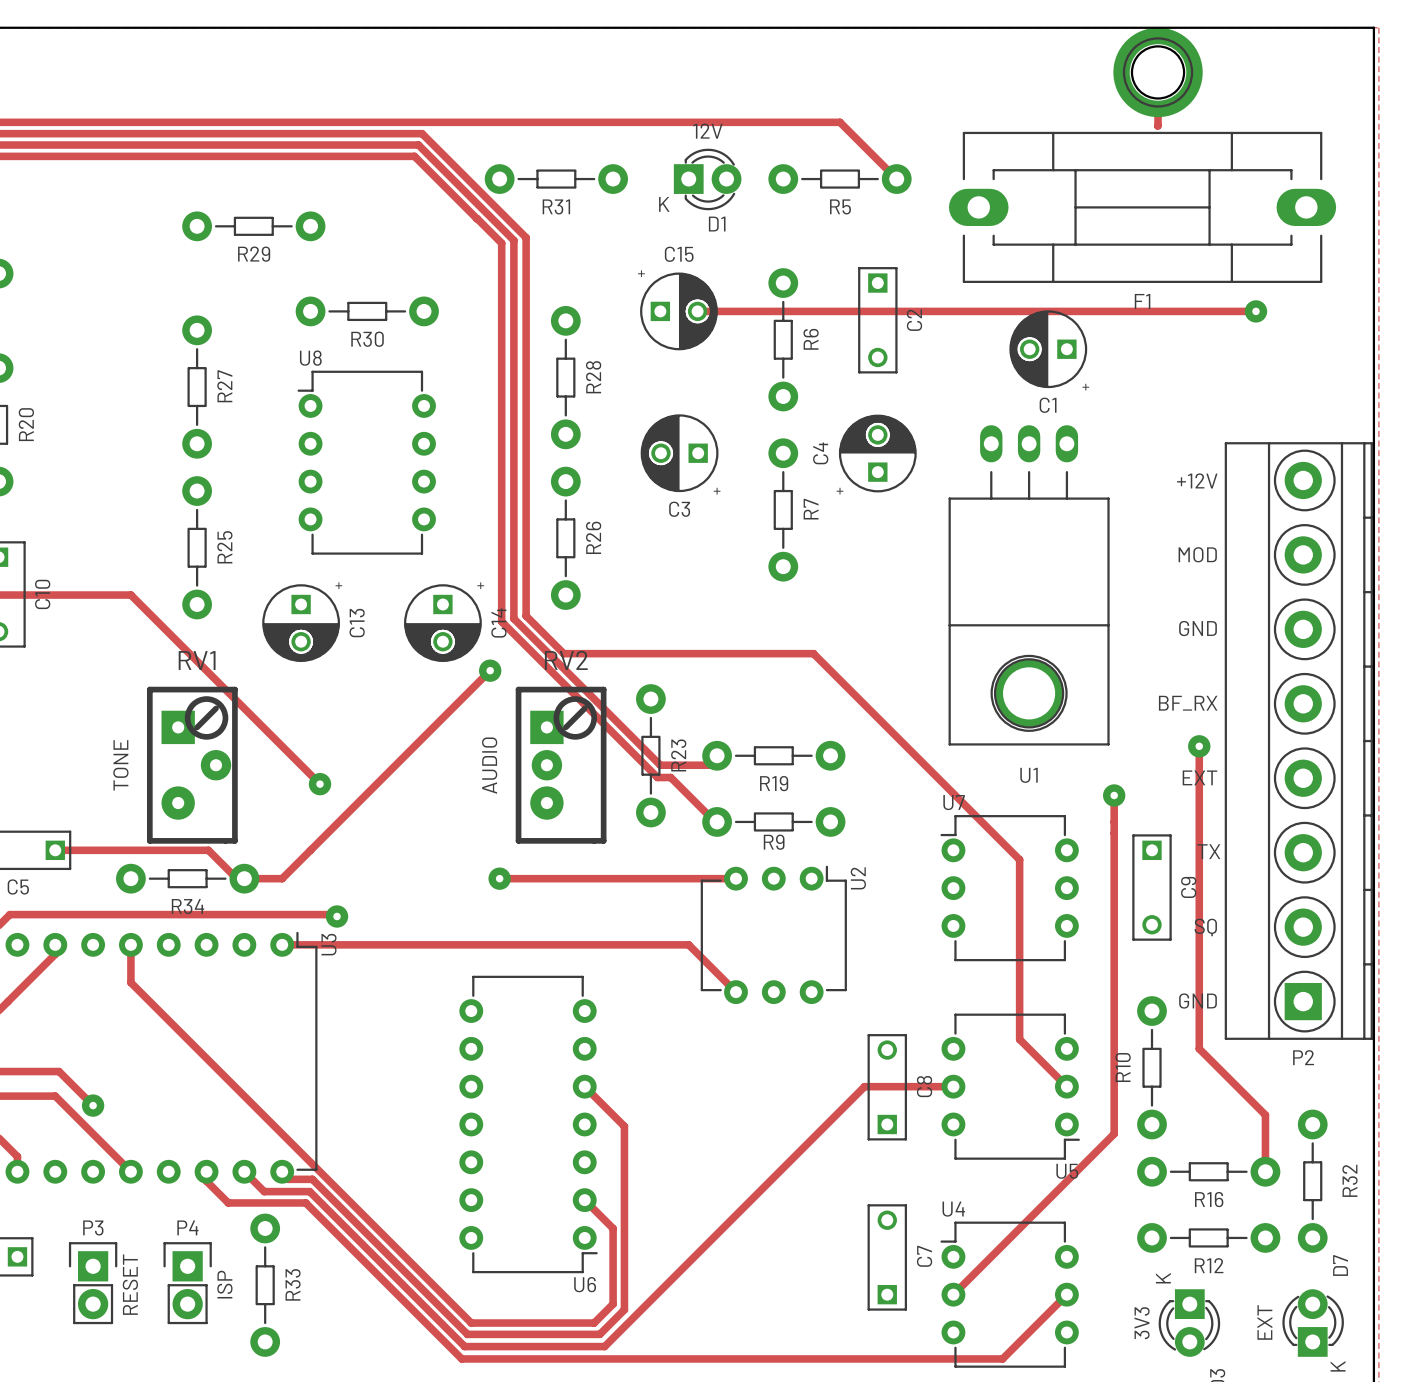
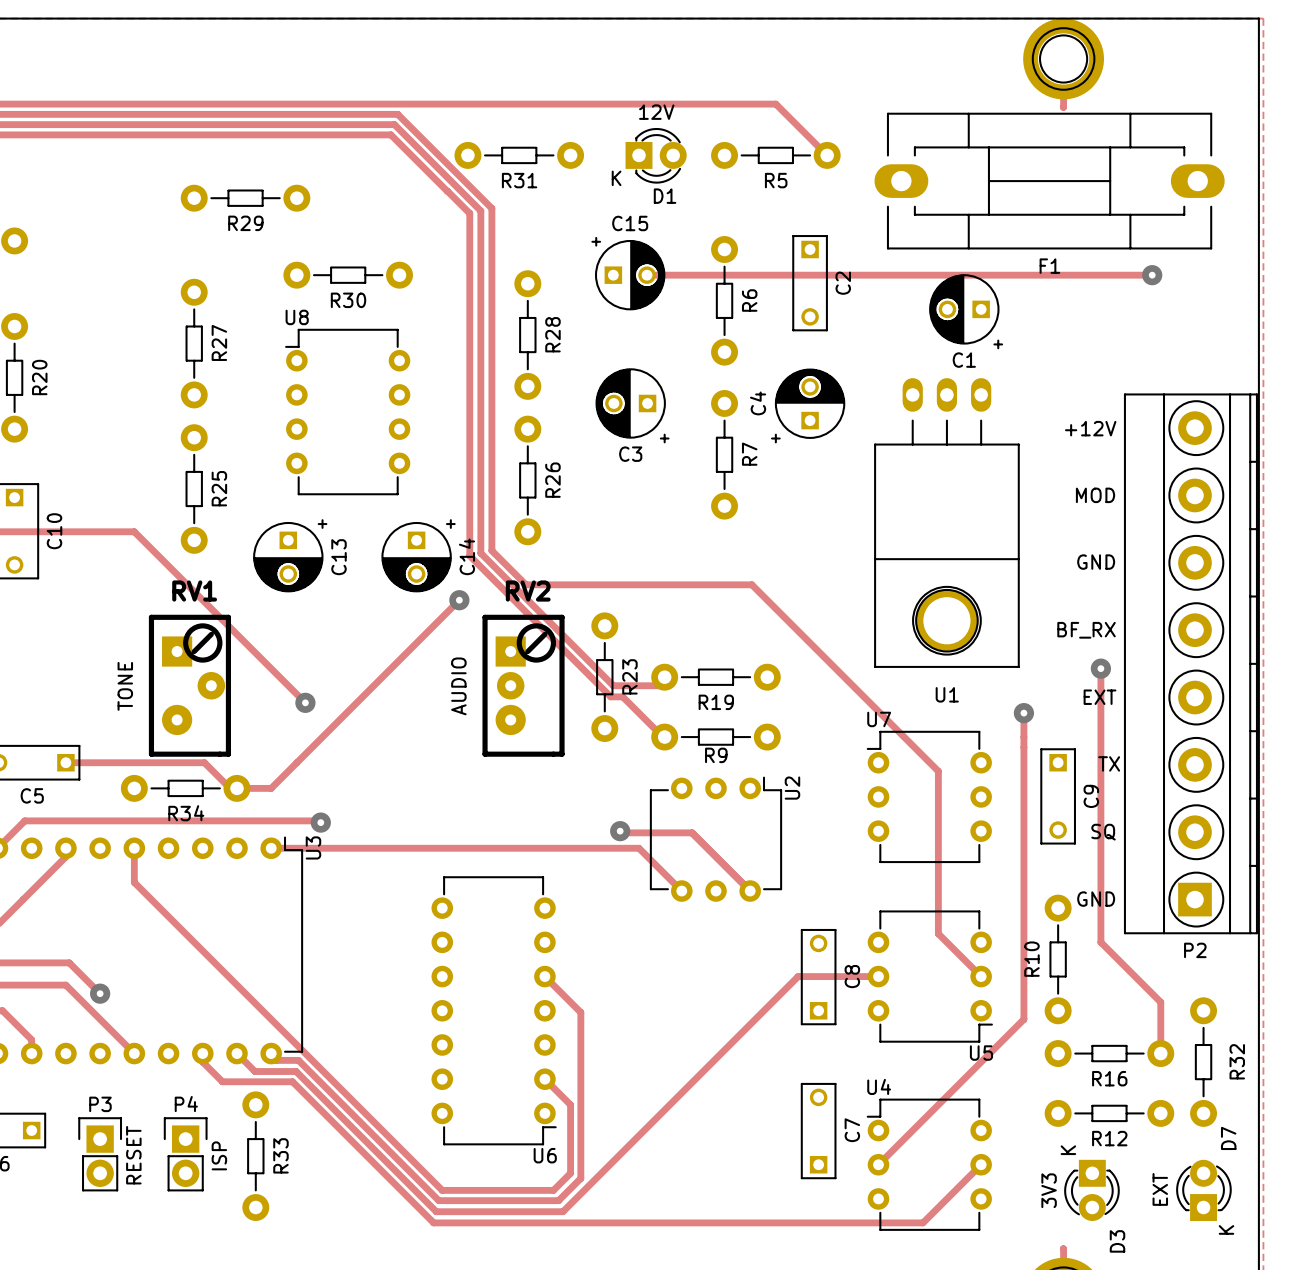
track: (499, 878) (736, 878) -> none
via: (499, 878) -> none
track: none -> (620, 831) (621, 832) (692, 832) (750, 891)
via: none -> (620, 831)

